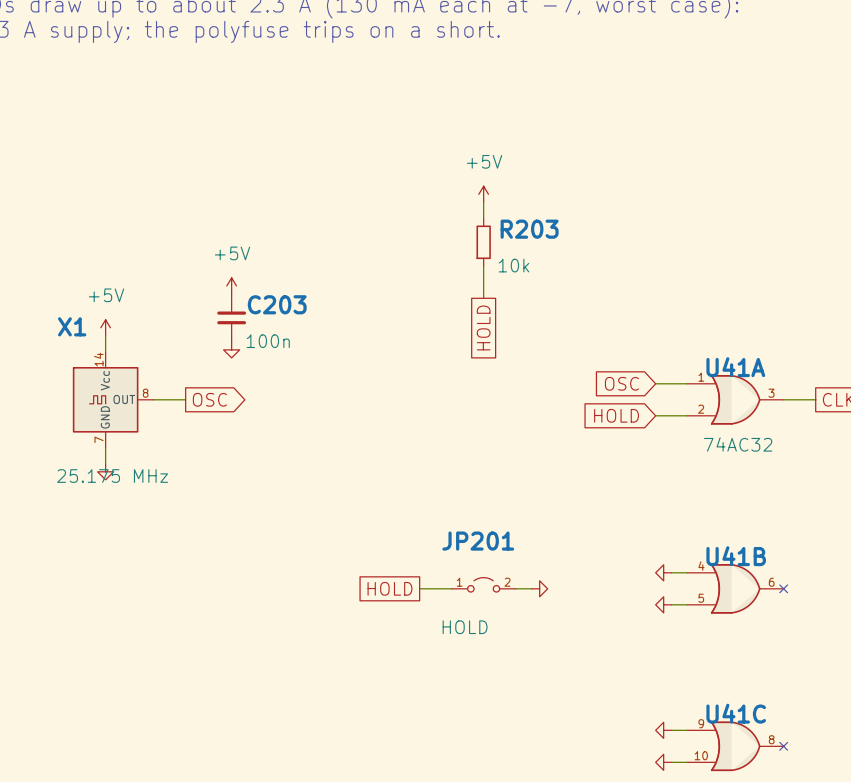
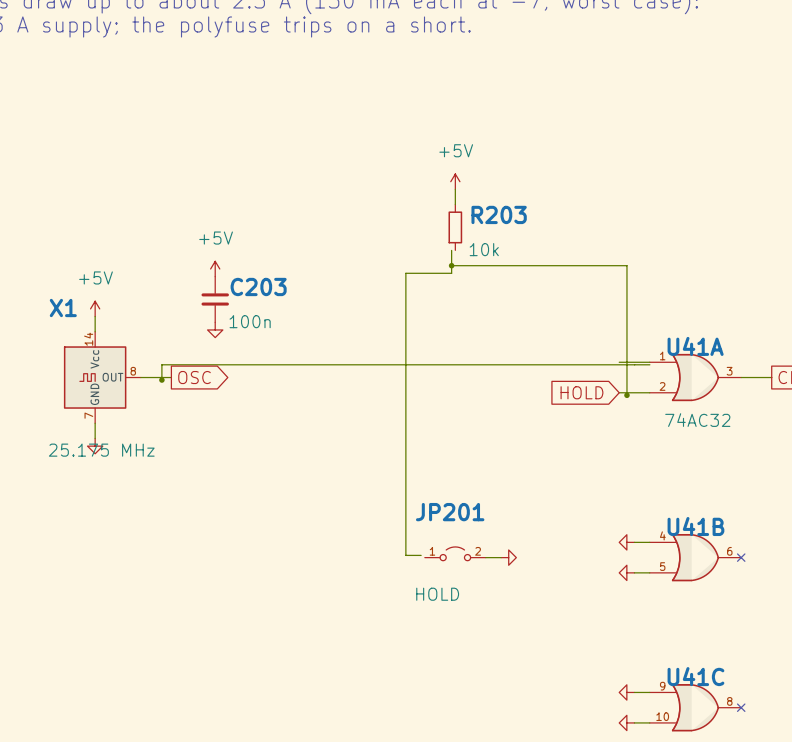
wire: none -> (451, 250) (451, 273) (405, 273) (405, 555) (421, 555)
wire: (483, 266) (483, 298) -> none
wire: none -> (451, 265) (626, 265) (626, 395)
junction: none -> (451, 265)
global label: HOLD (483, 327) -> none
global label: OSC (621, 383) -> none
wire: none -> (649, 364) (161, 364) (161, 380)
junction: none -> (161, 380)
junction: none -> (626, 395)
global label: HOLD (389, 588) -> none
wire: (419, 588) (451, 588) -> none

